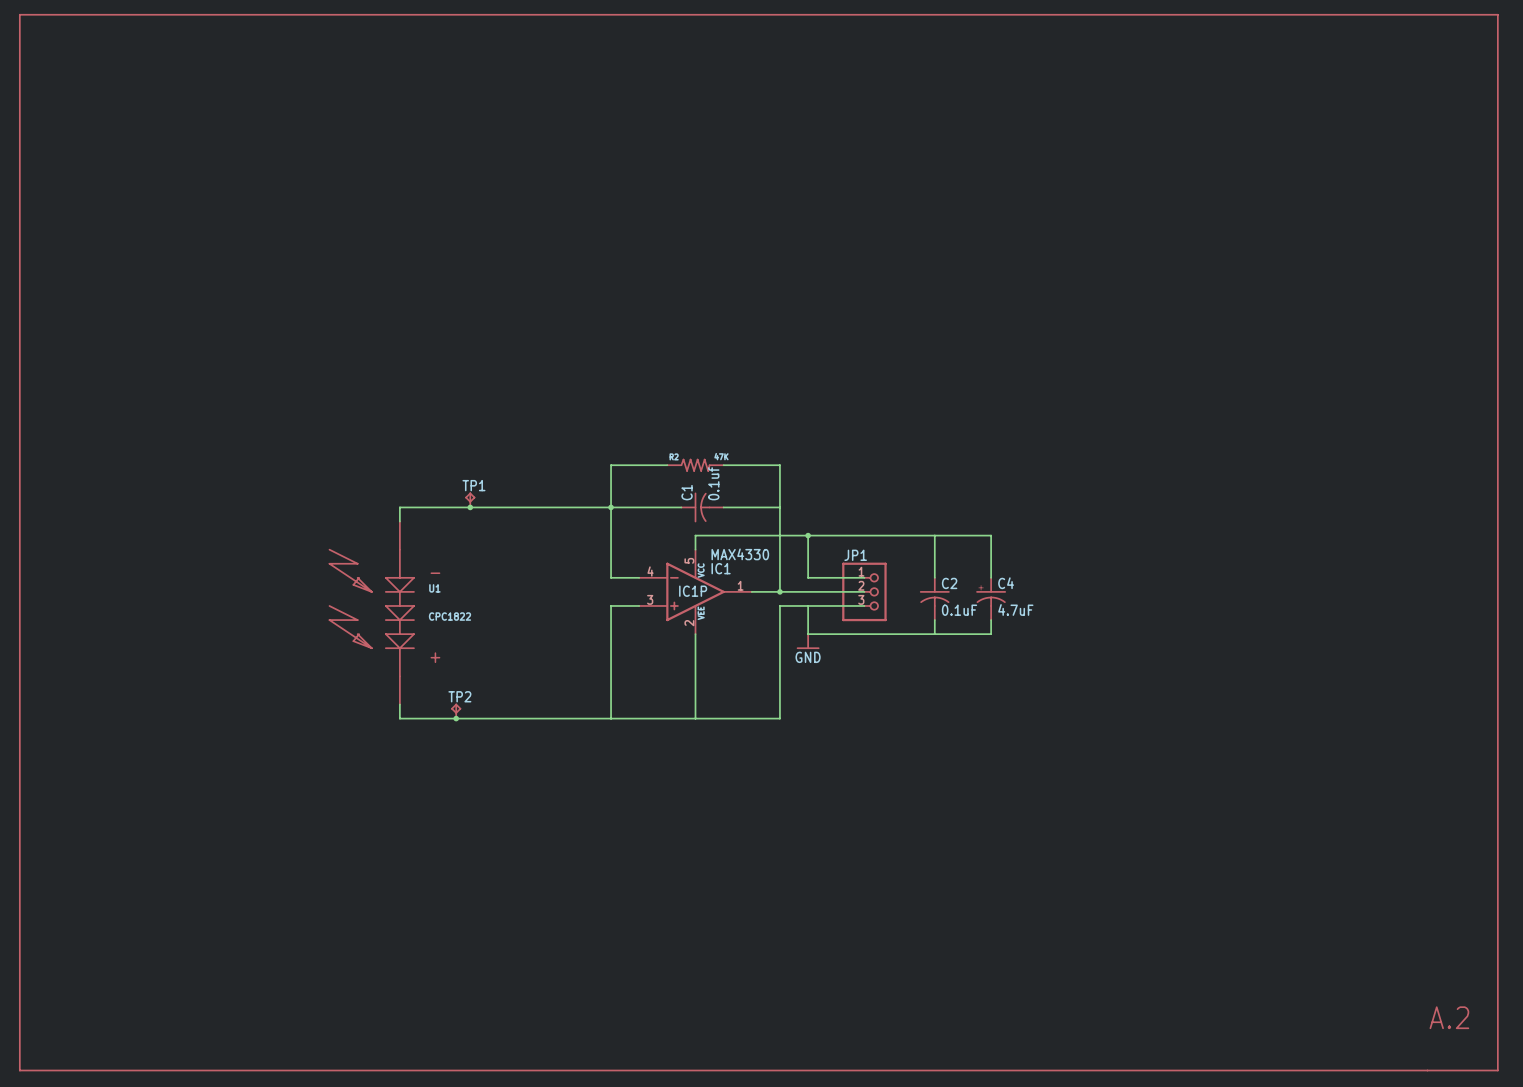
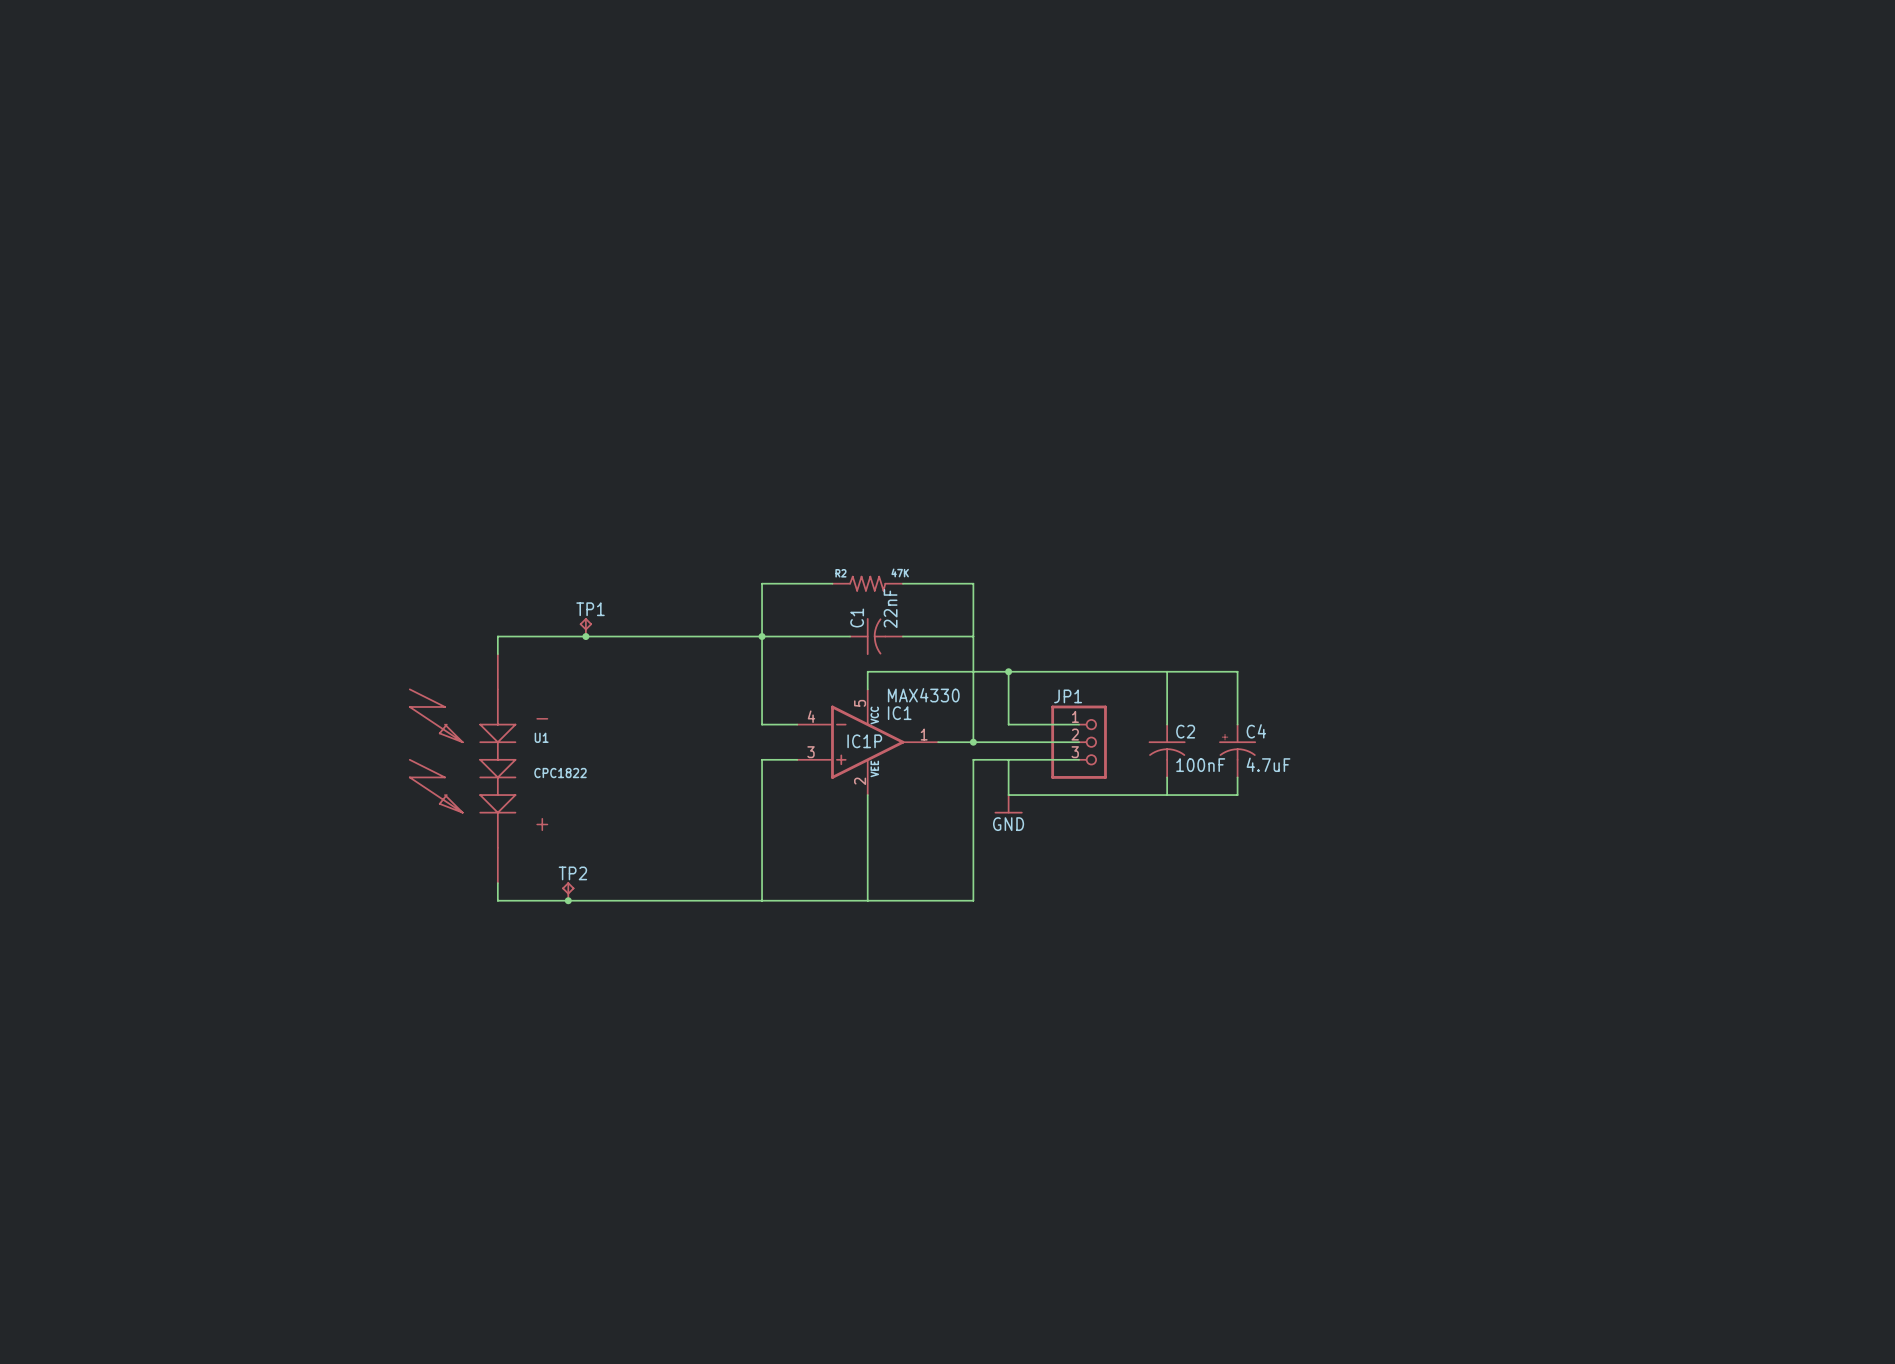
C1 value: 0.1uf (713, 483) -> 22nF (890, 608)
part: (758, 542) -> none
C2 value: 0.1uF (959, 610) -> 100nF (1200, 765)
text: A.2 (1449, 1017) -> none

